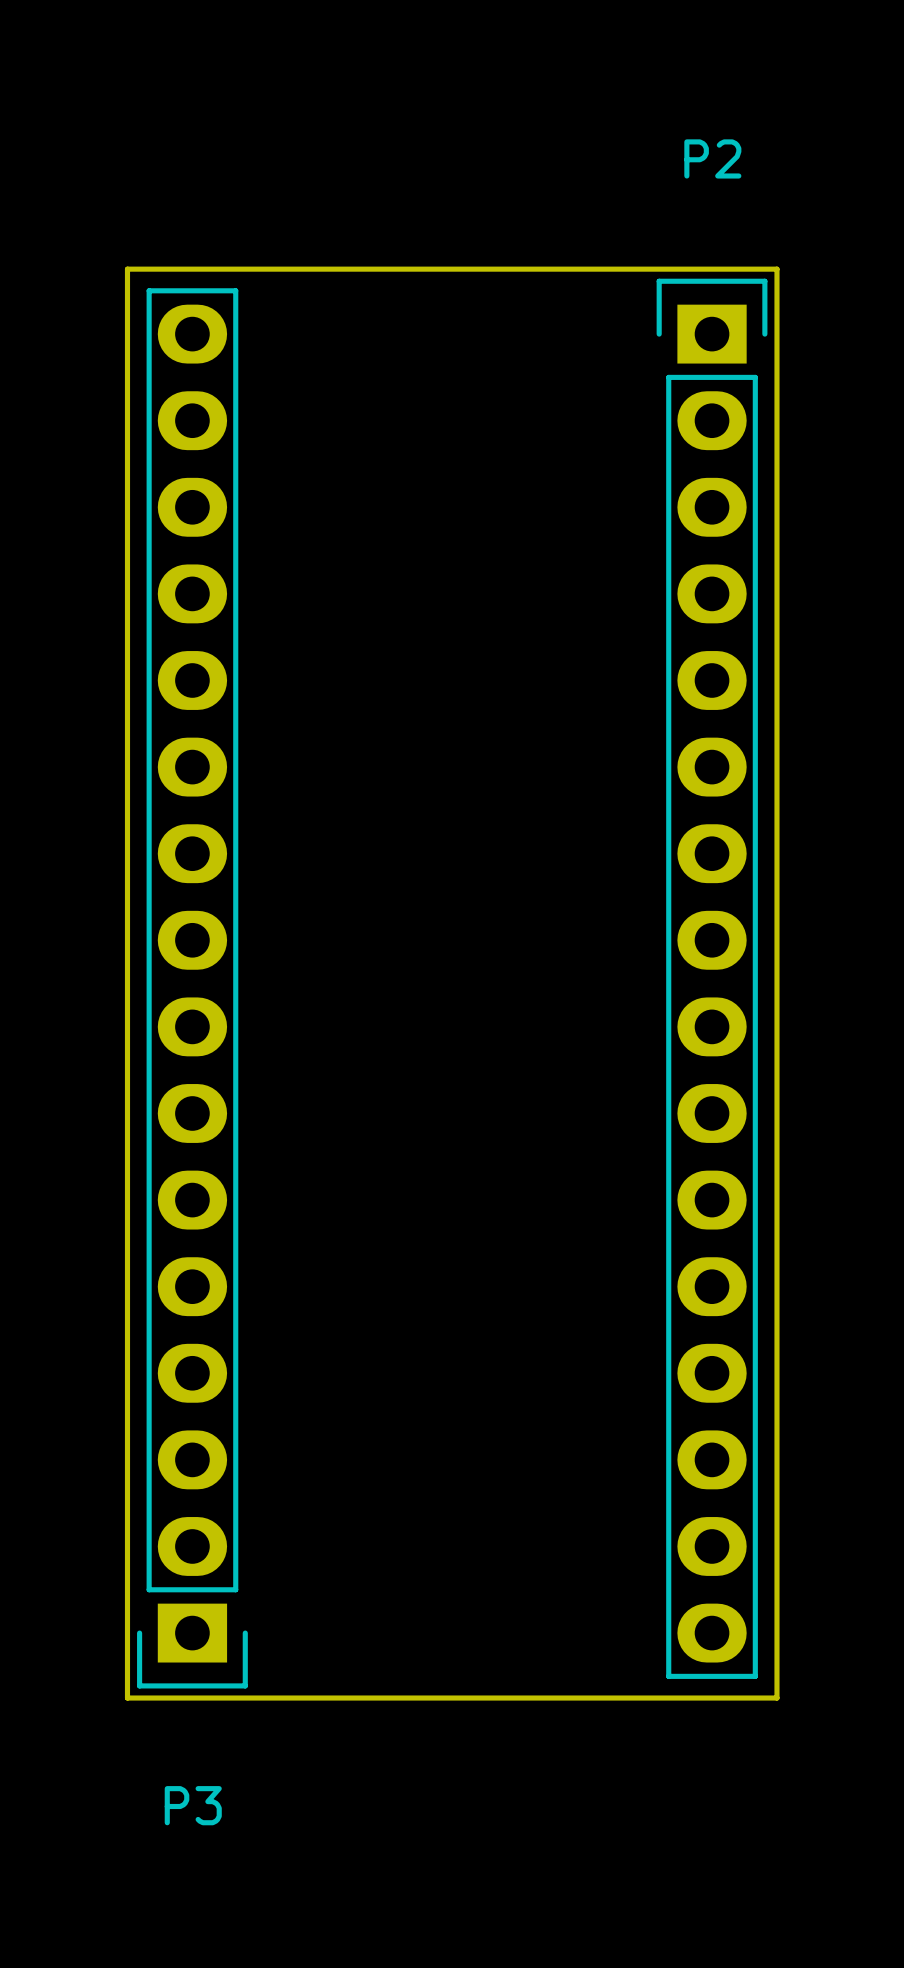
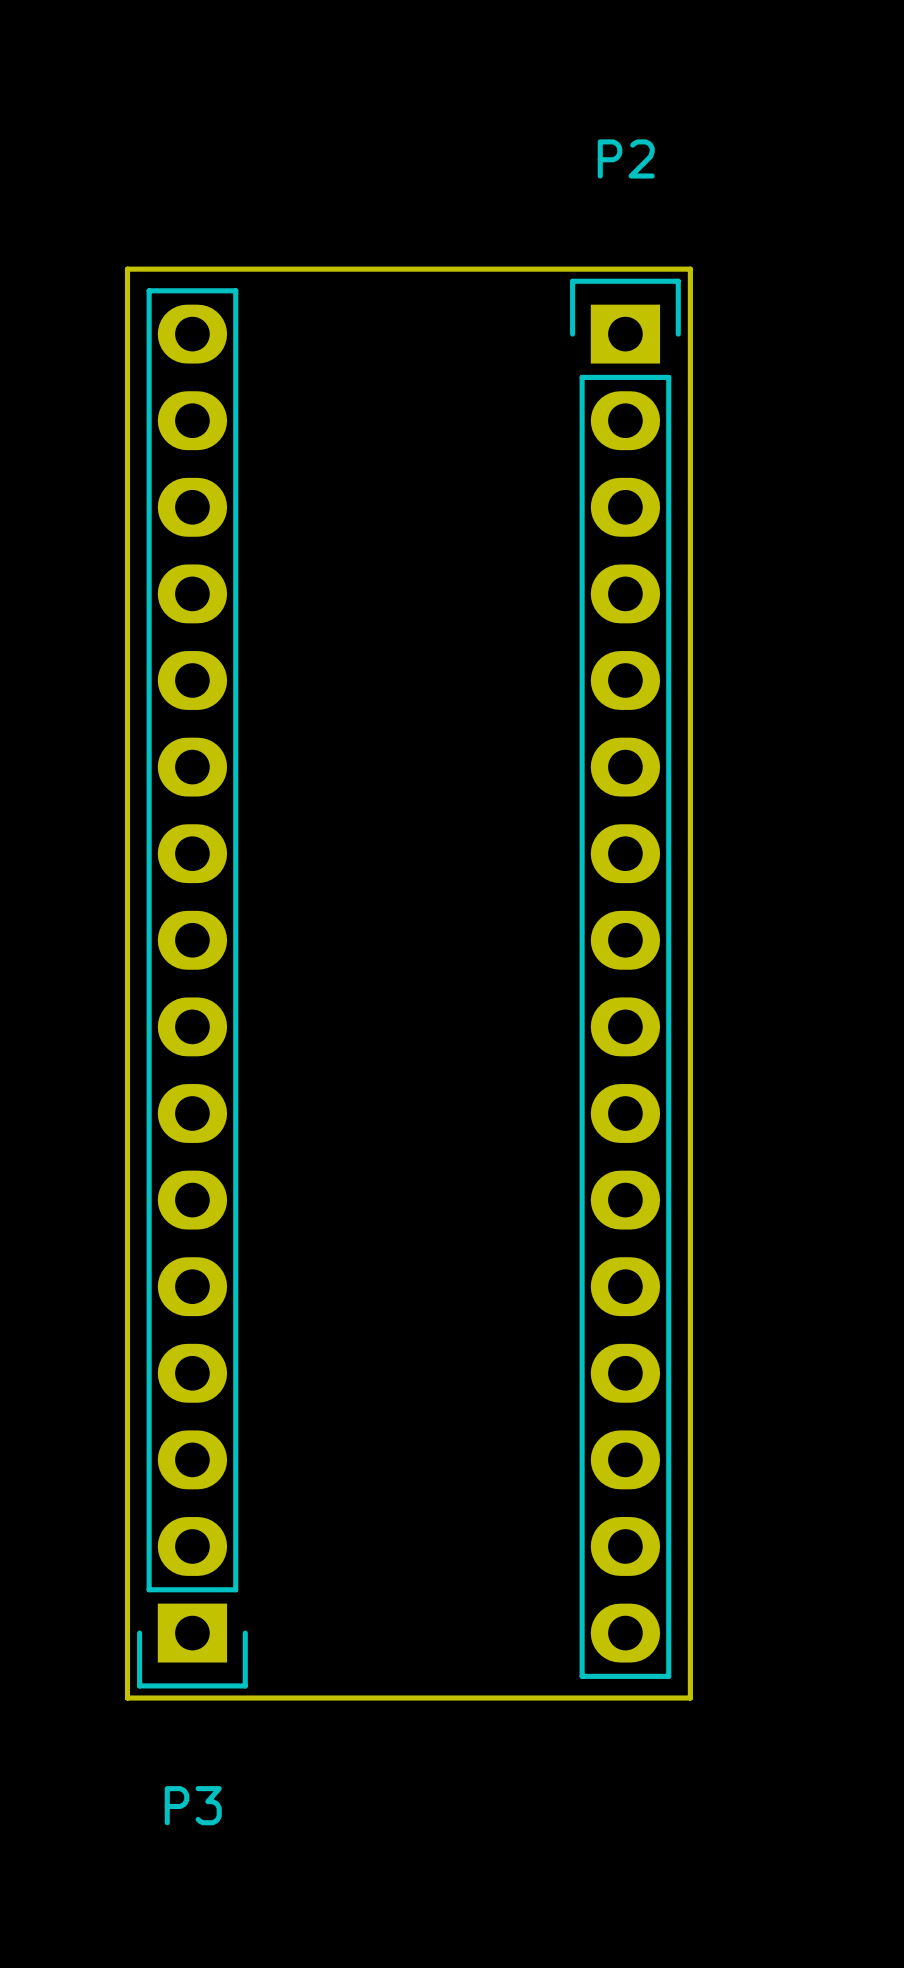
board edge: (690, 269) (776, 269) (776, 1698) (690, 1698) -> (690, 269) (690, 1698)
P2 position: (712, 978) -> (625, 978)

